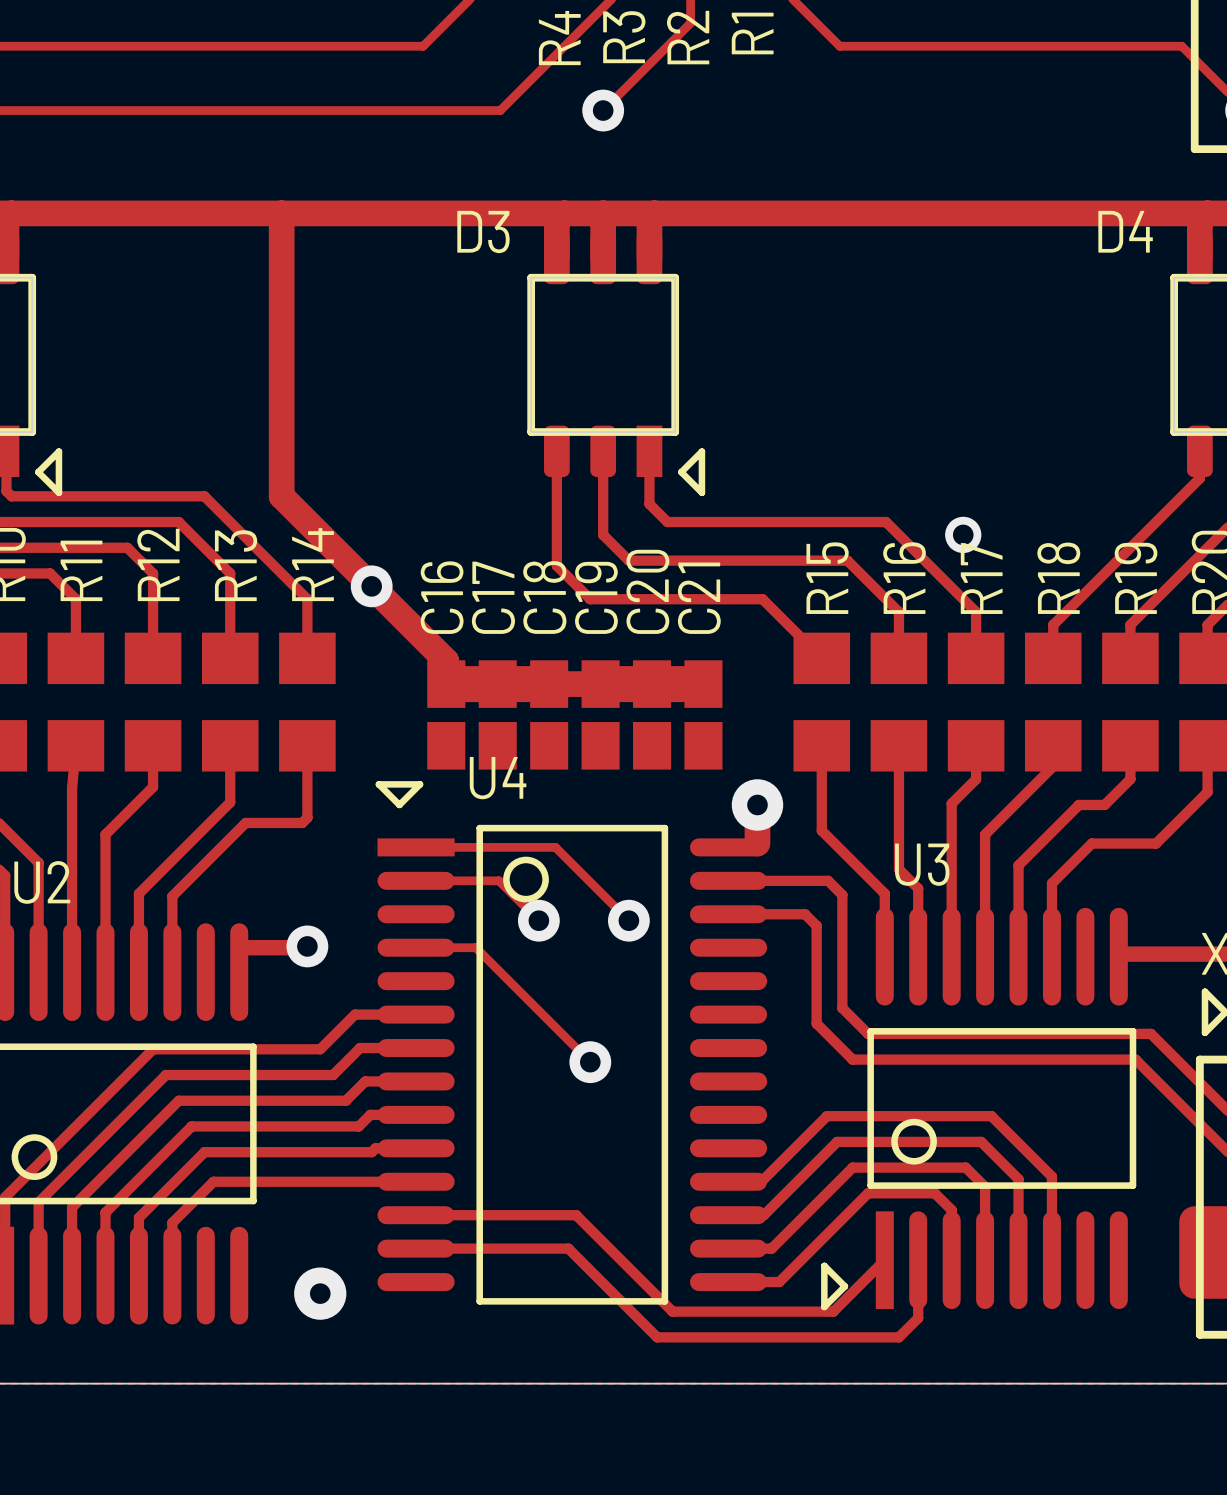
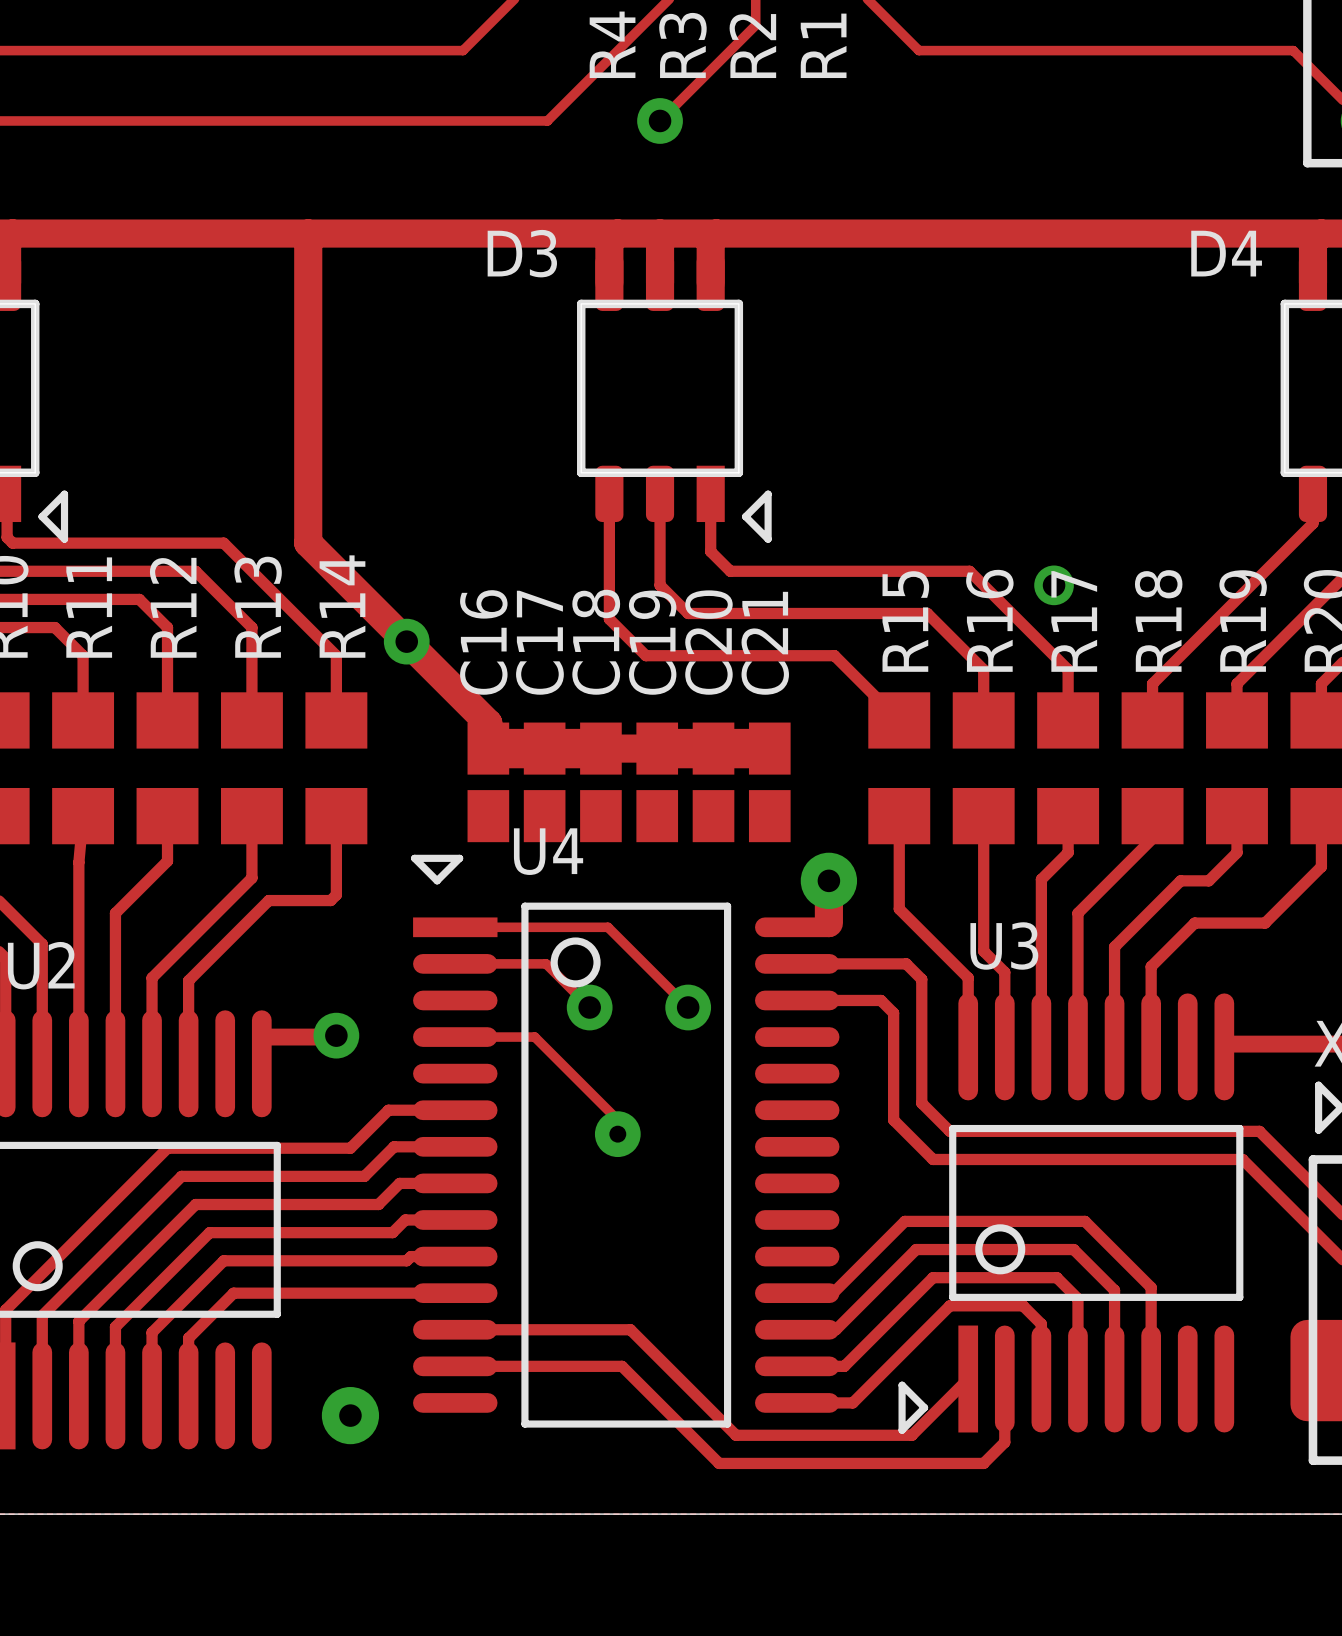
track: (475, 947) (590, 1062) -> (520, 1037) (534, 1037) (617, 1120) (617, 1134)
via position: (590, 1062) -> (617, 1134)

